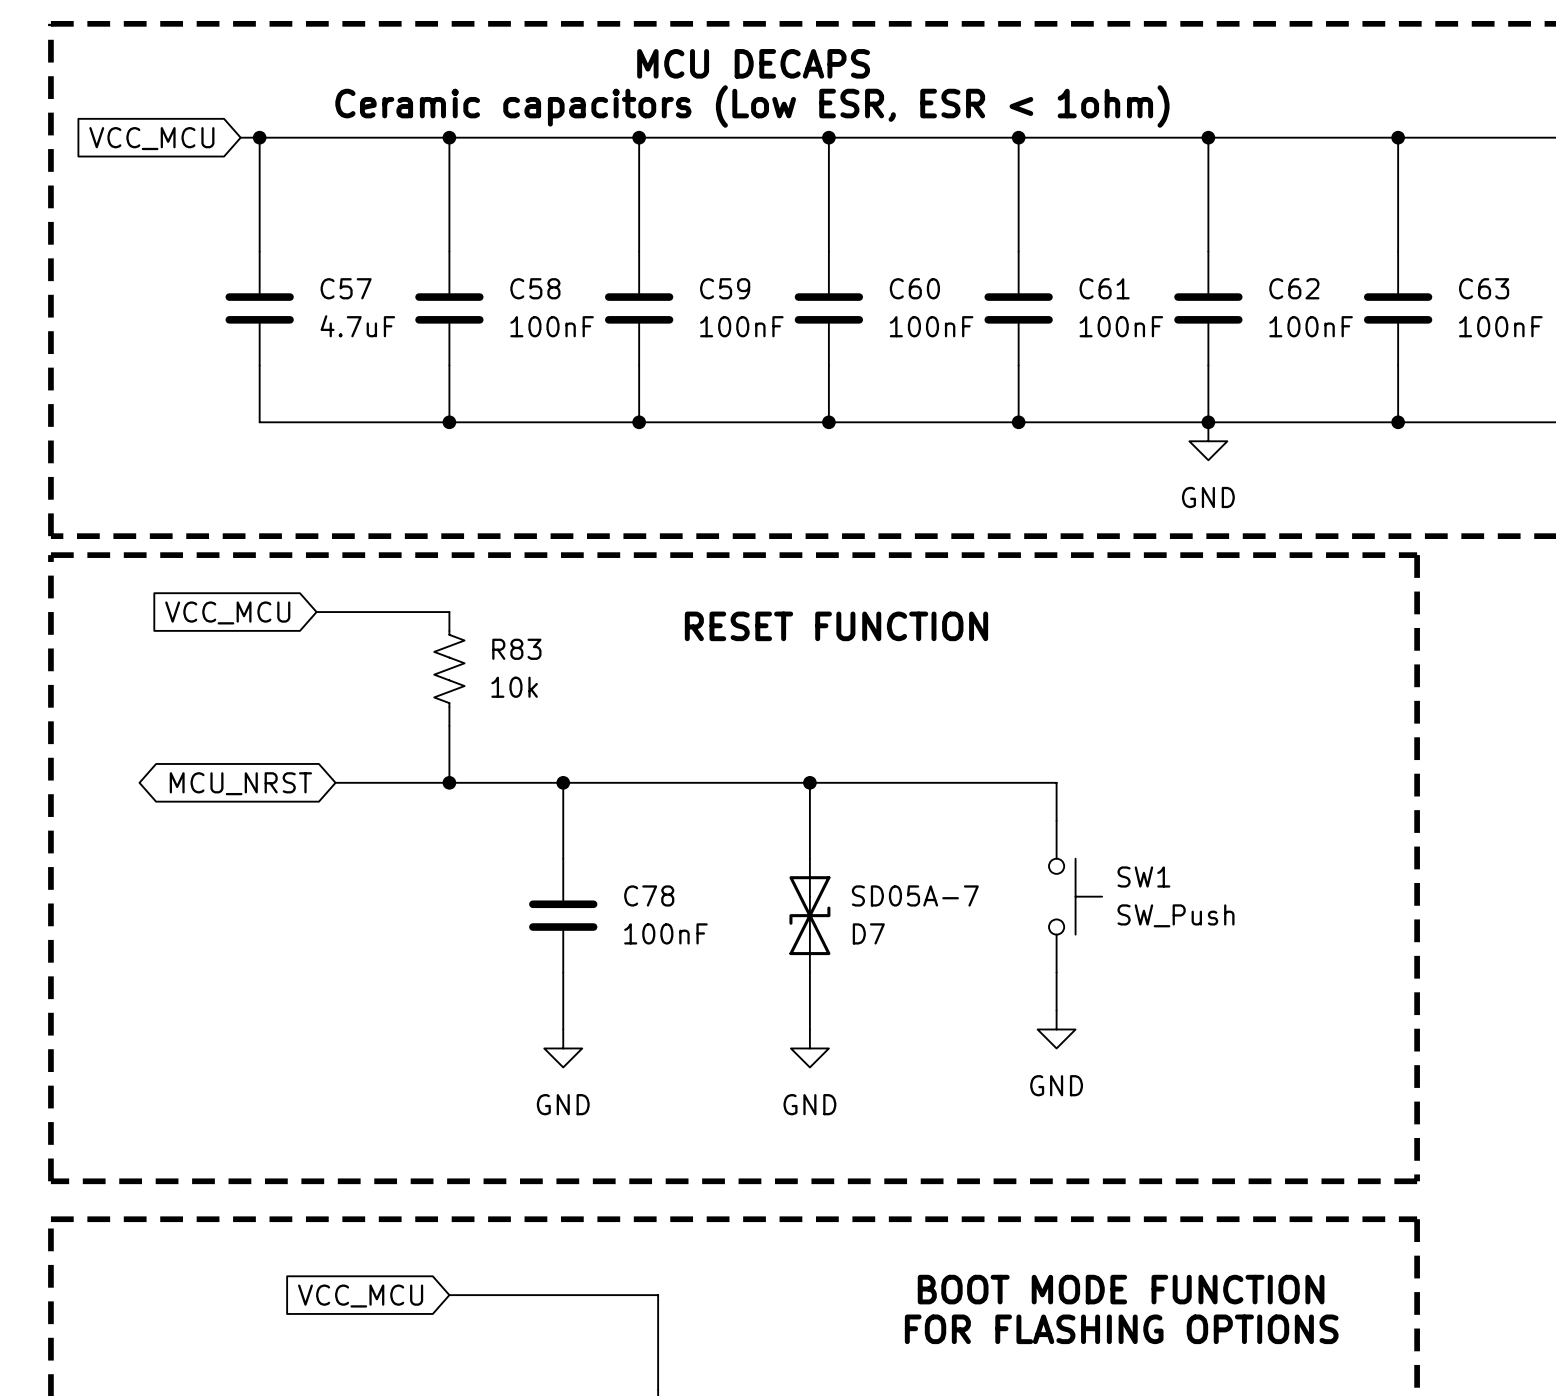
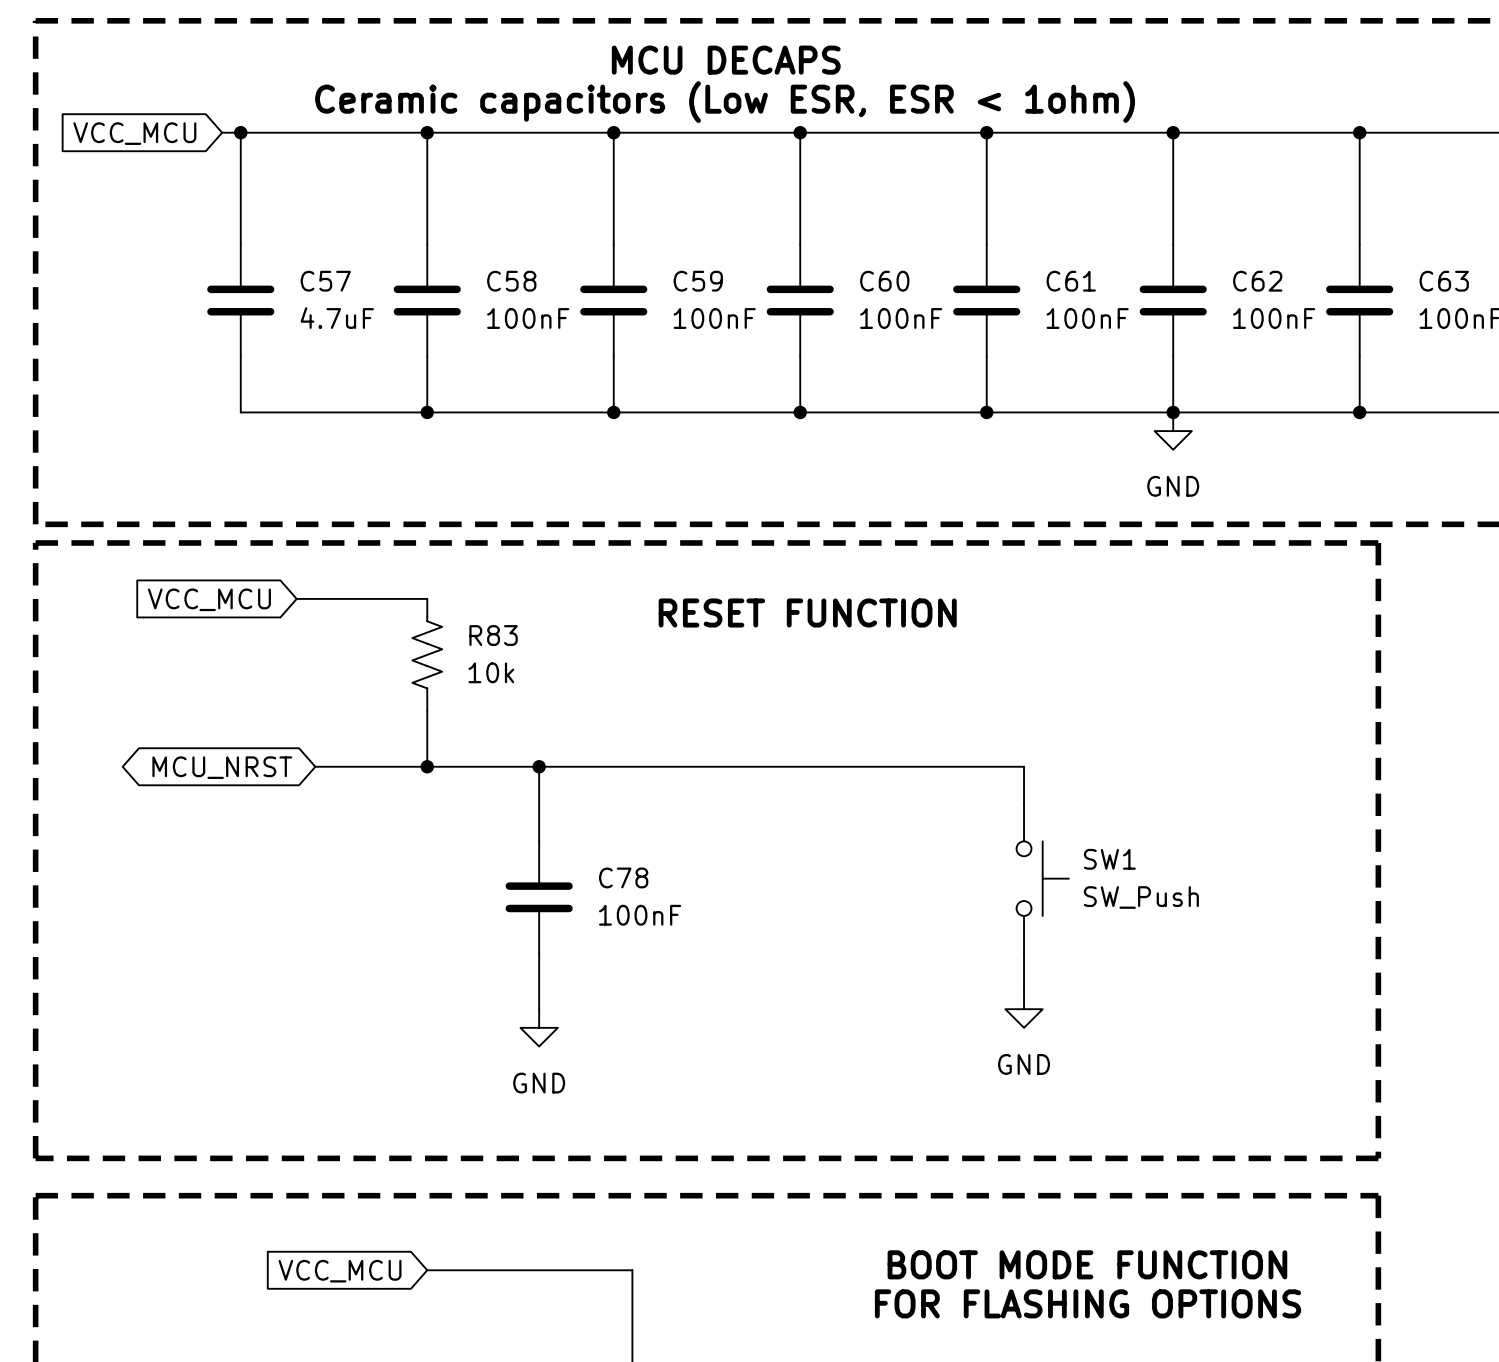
wire: (809, 782) (809, 858) -> none
junction: (809, 782) -> none
D7: SD05A-7 (809, 915) -> none
wire: (809, 972) (809, 1029) -> none
power symbol: GND (809, 1048) -> none

